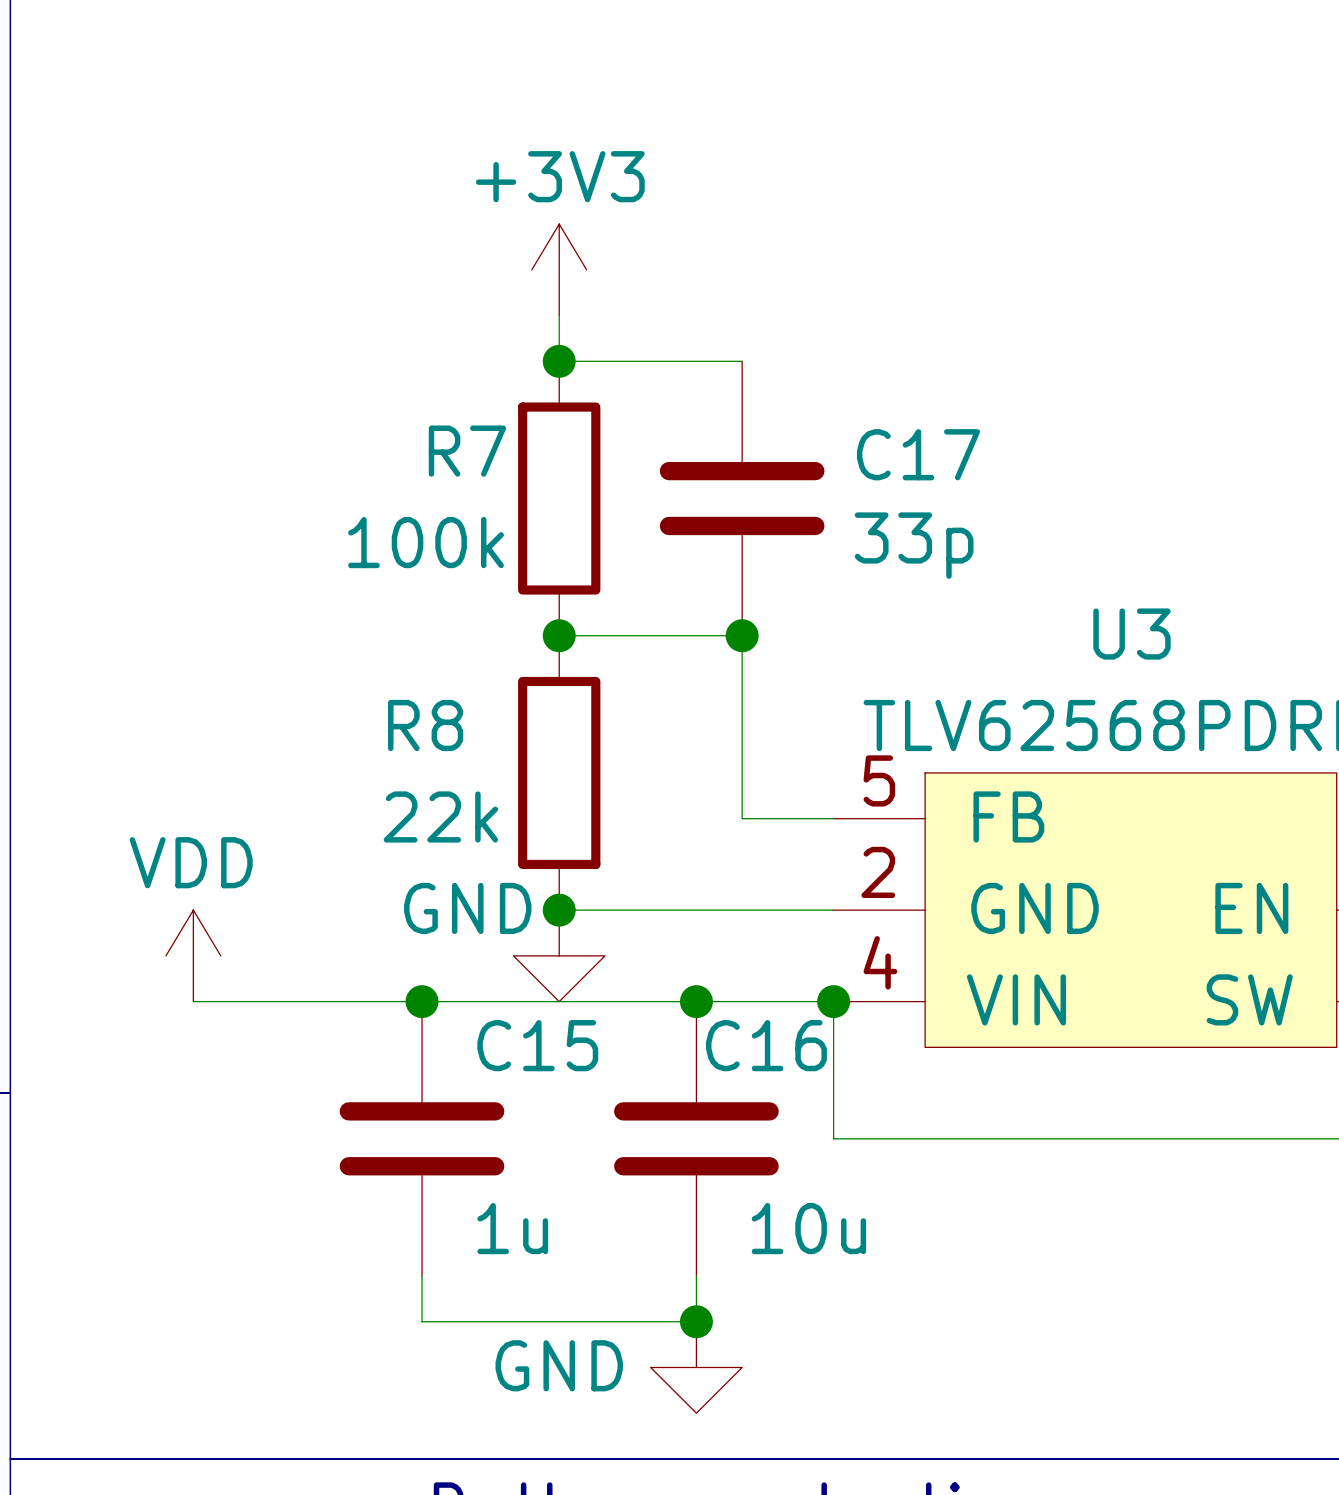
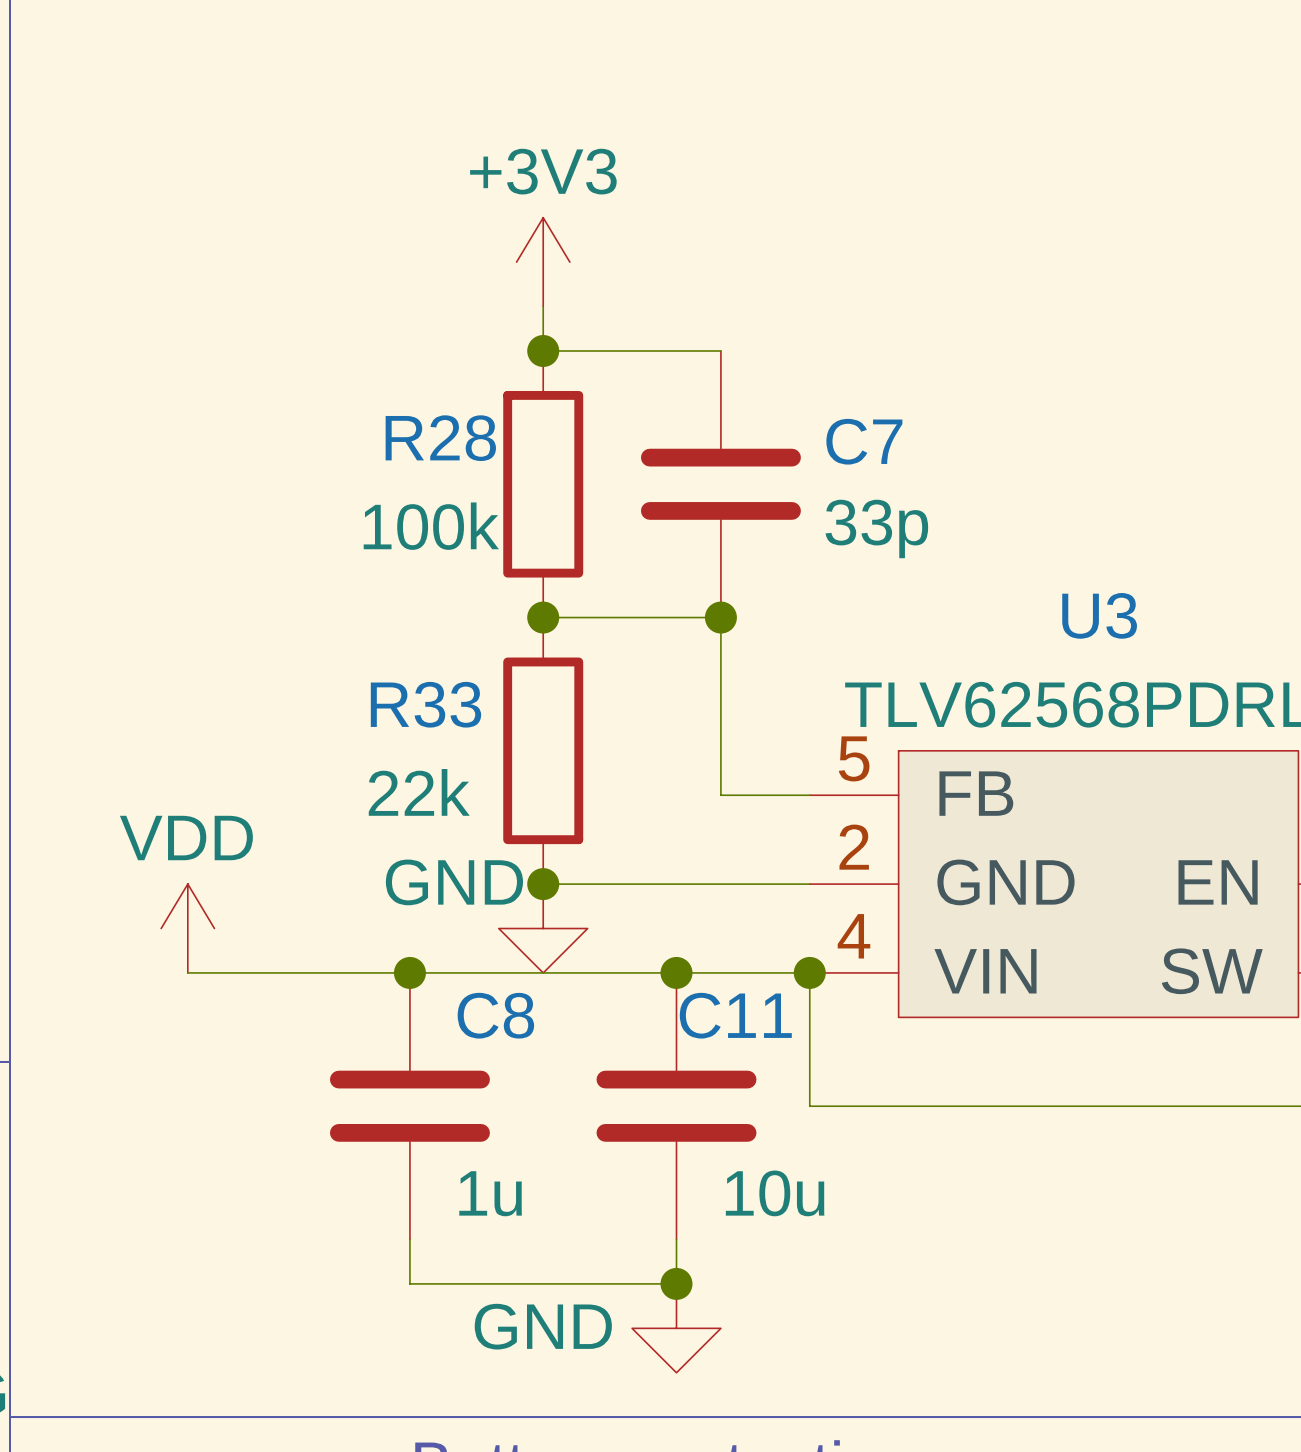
R7 name: R7 (467, 451) -> R28 (440, 438)
C17 name: C17 (918, 454) -> C7 (864, 441)
R8 name: R8 (425, 725) -> R33 (425, 704)
C15 name: C15 (537, 1045) -> C8 (495, 1015)
C16 name: C16 (766, 1045) -> C11 (735, 1015)

